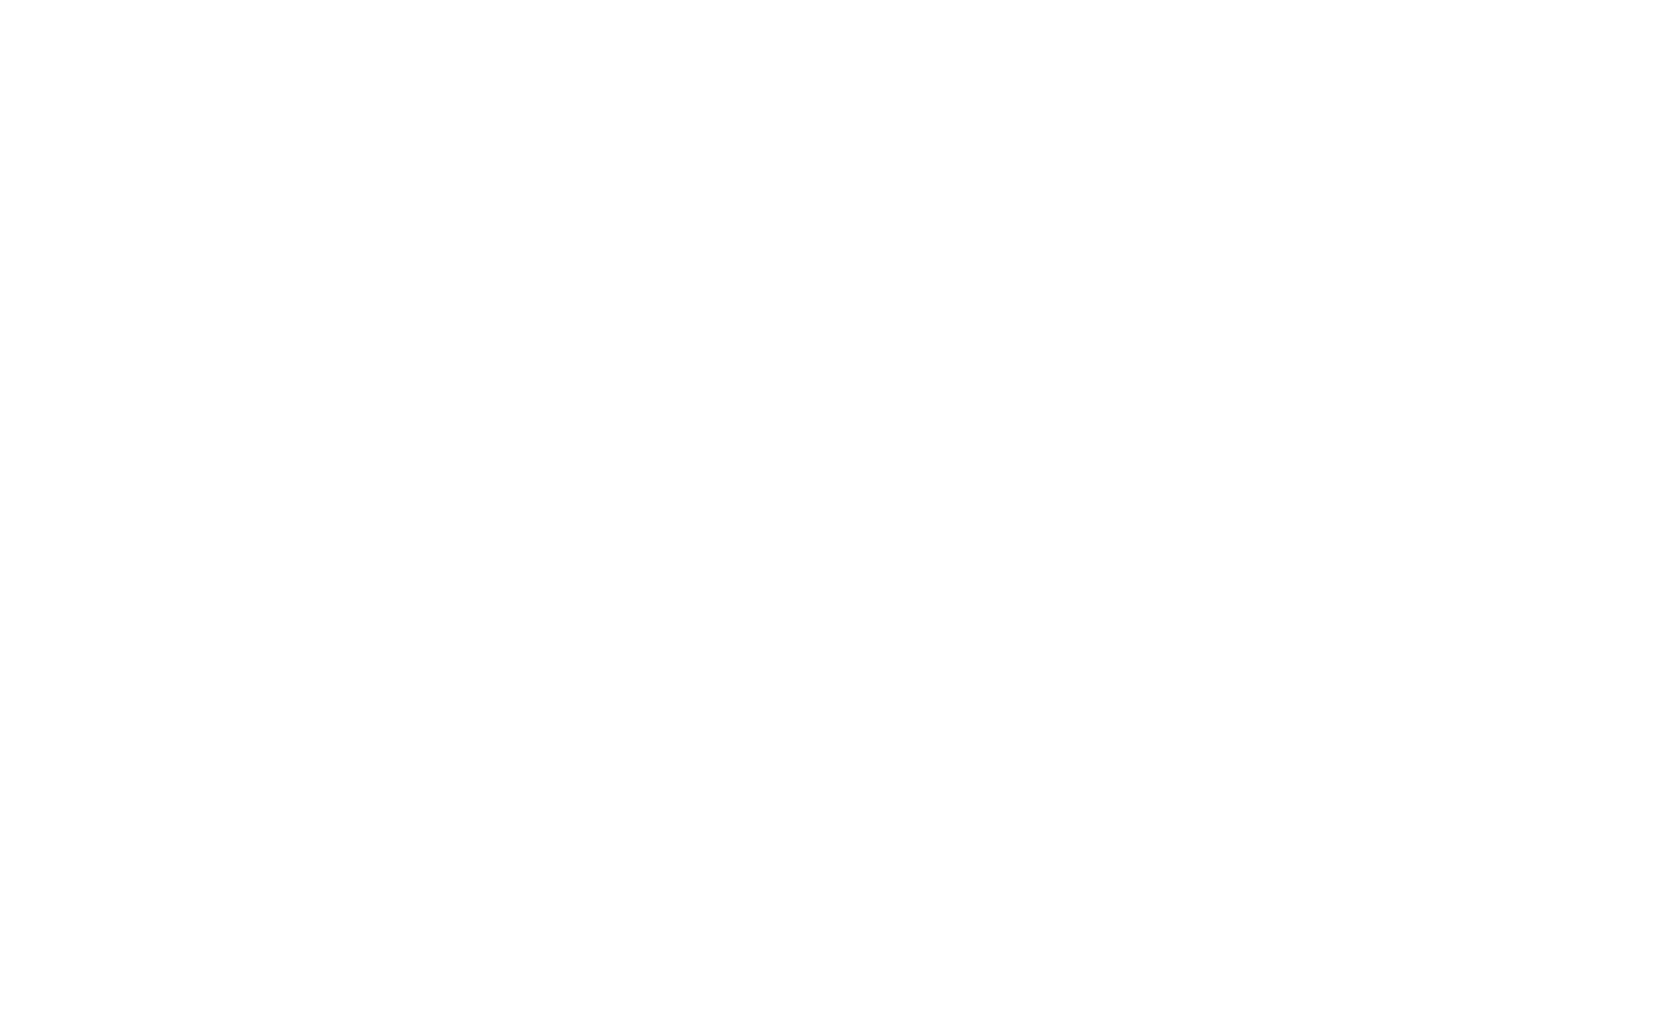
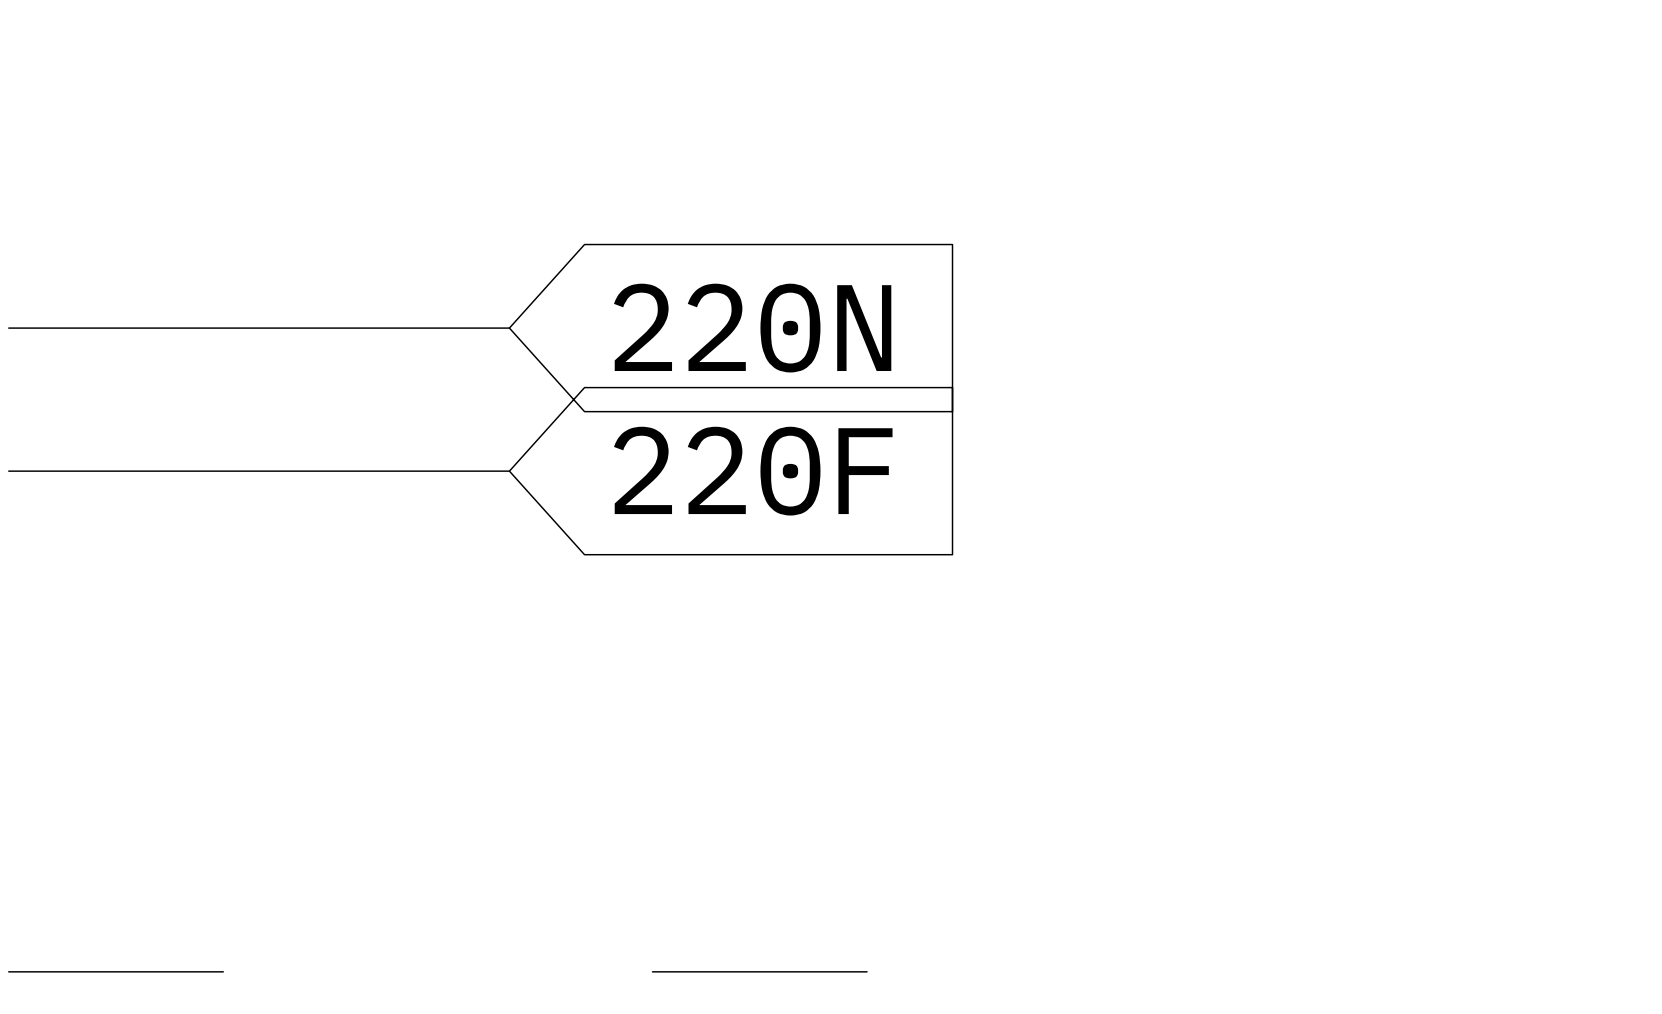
wire: none -> (8, 328) (509, 328)
global label: none -> 220N (752, 328)
wire: none -> (8, 471) (509, 471)
global label: none -> 220F (753, 471)
wire: none -> (8, 971) (223, 971)
wire: none -> (652, 971) (867, 971)

